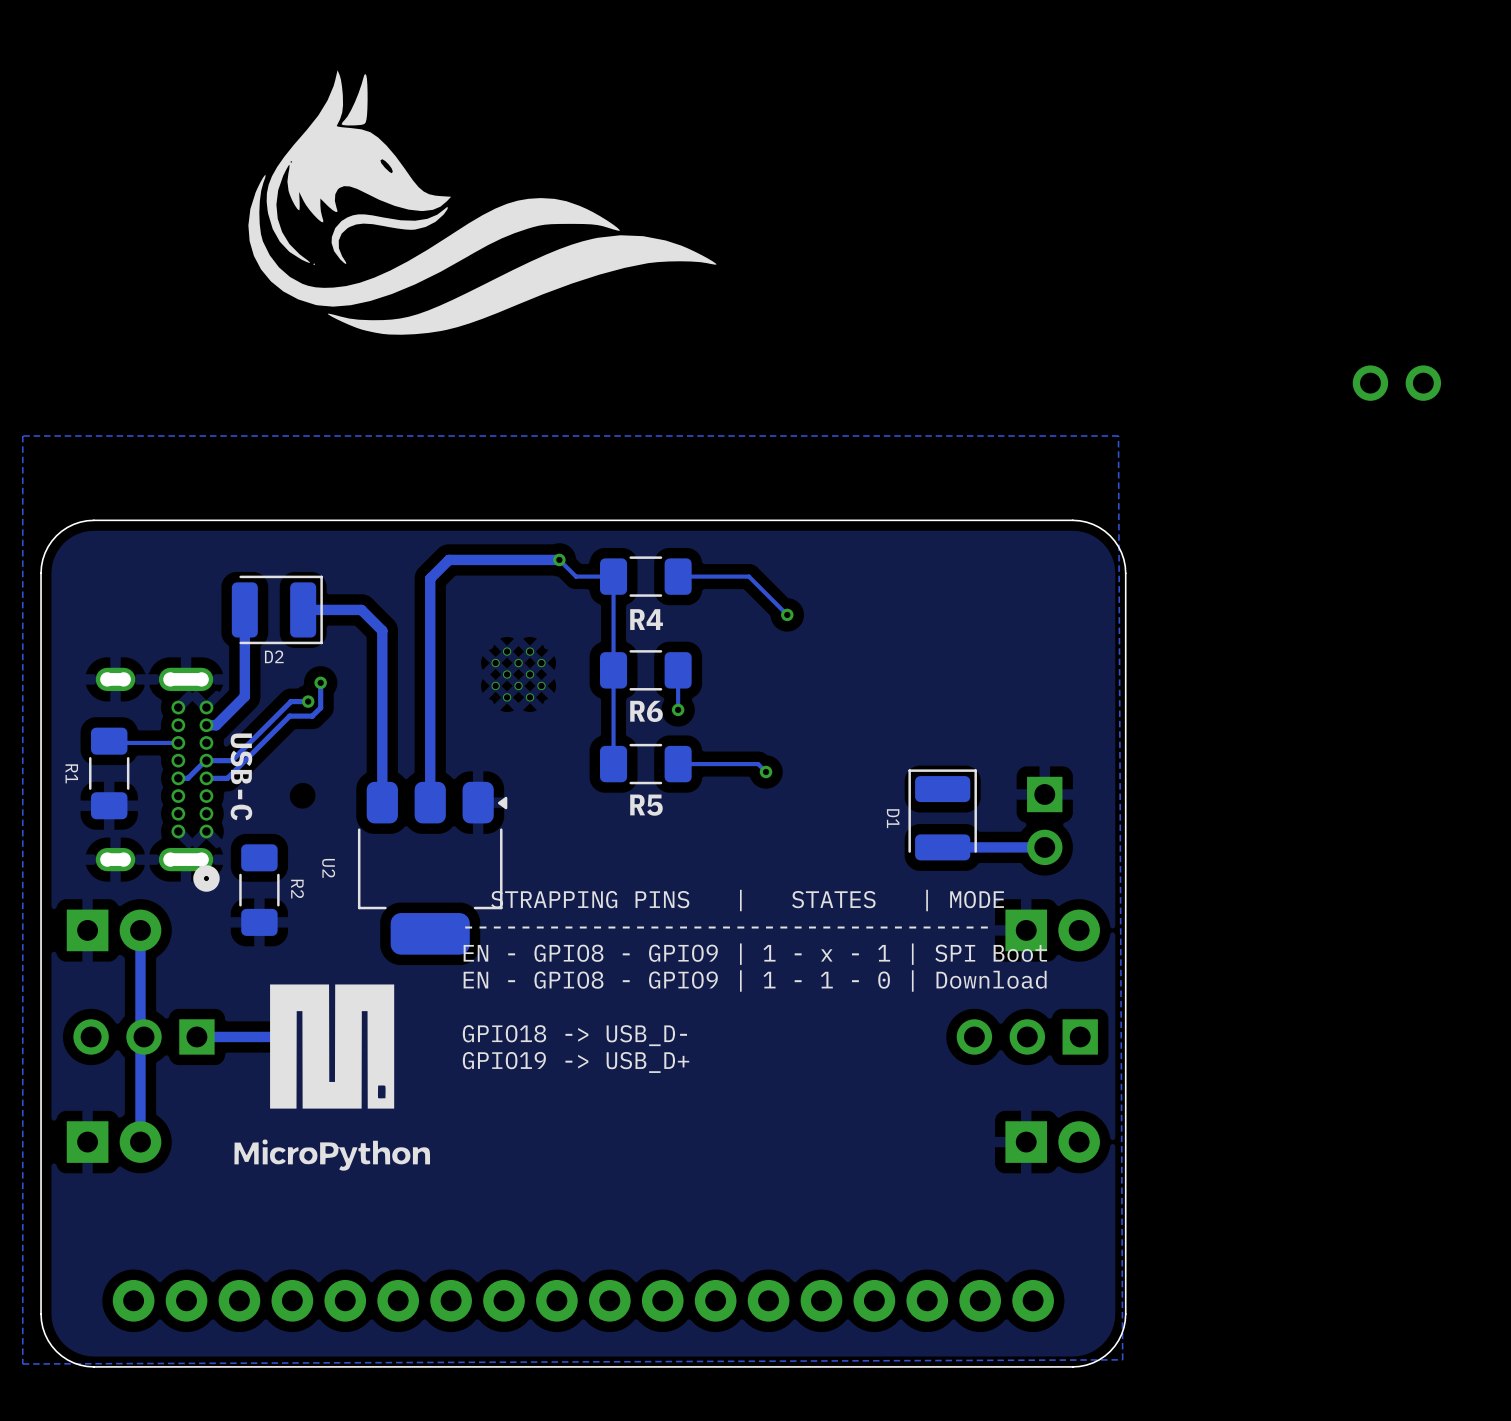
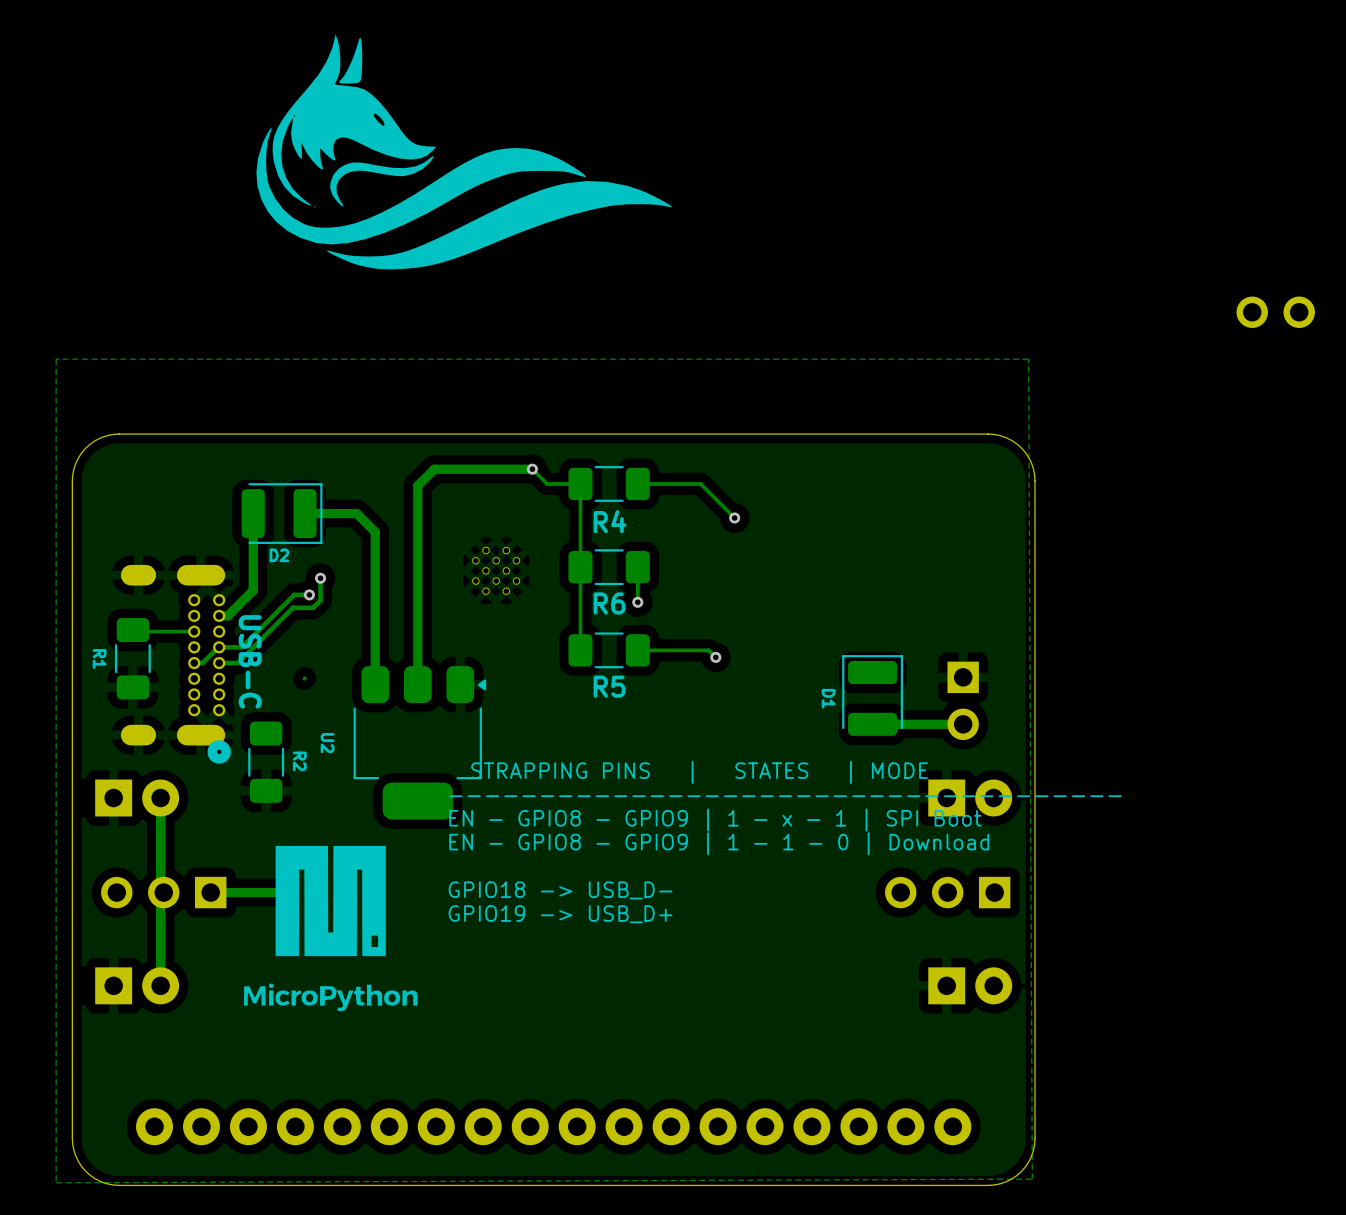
track: none -> (304, 678) (304, 678)

